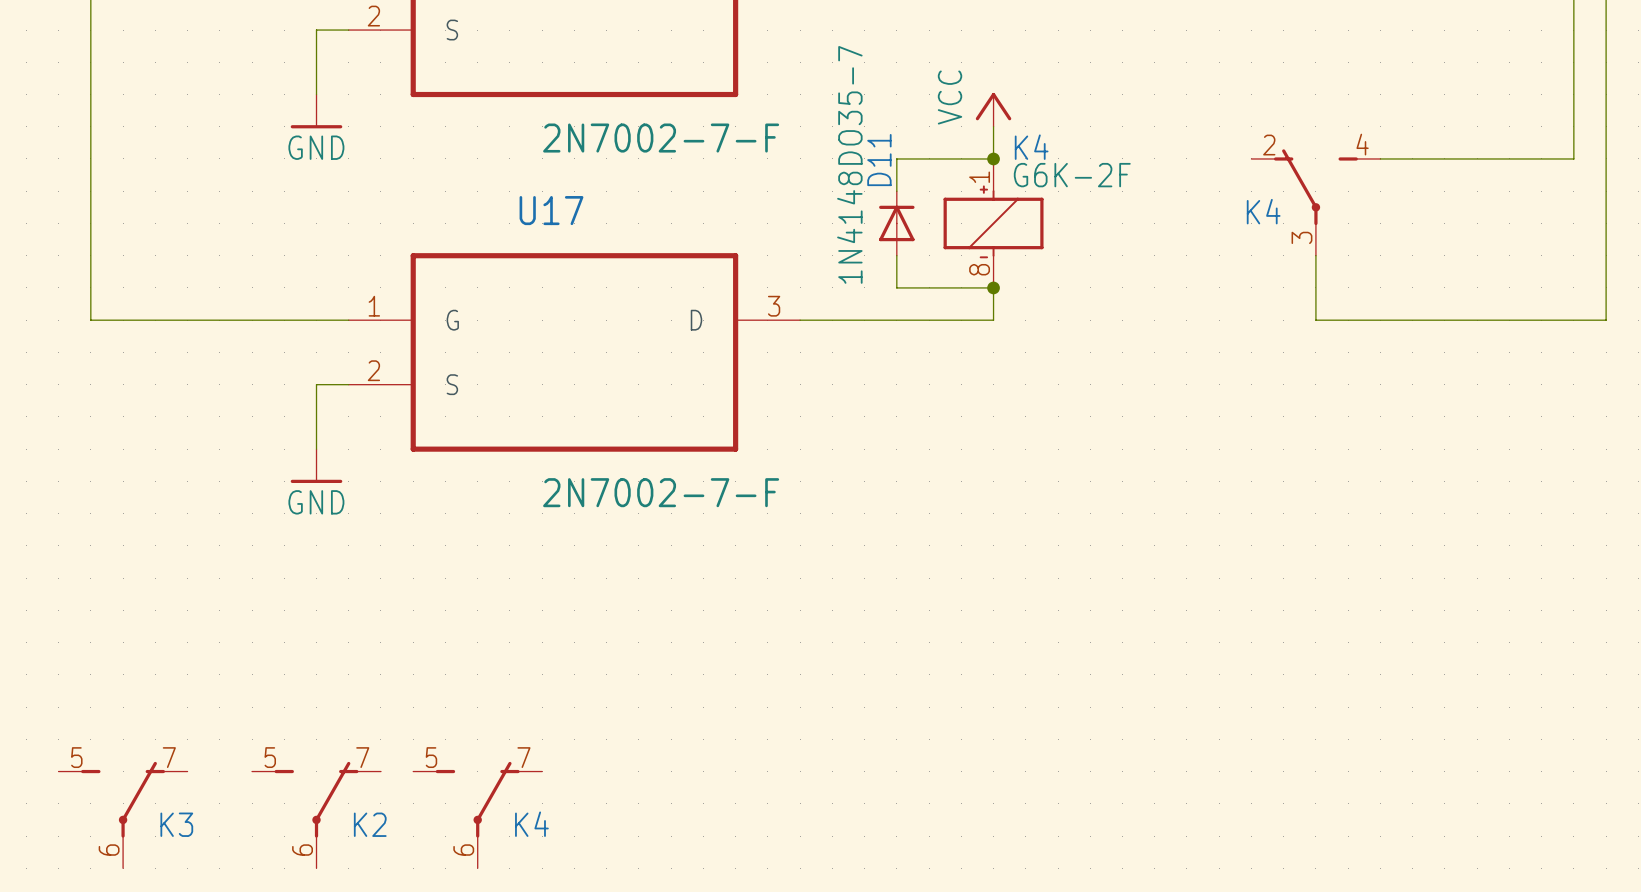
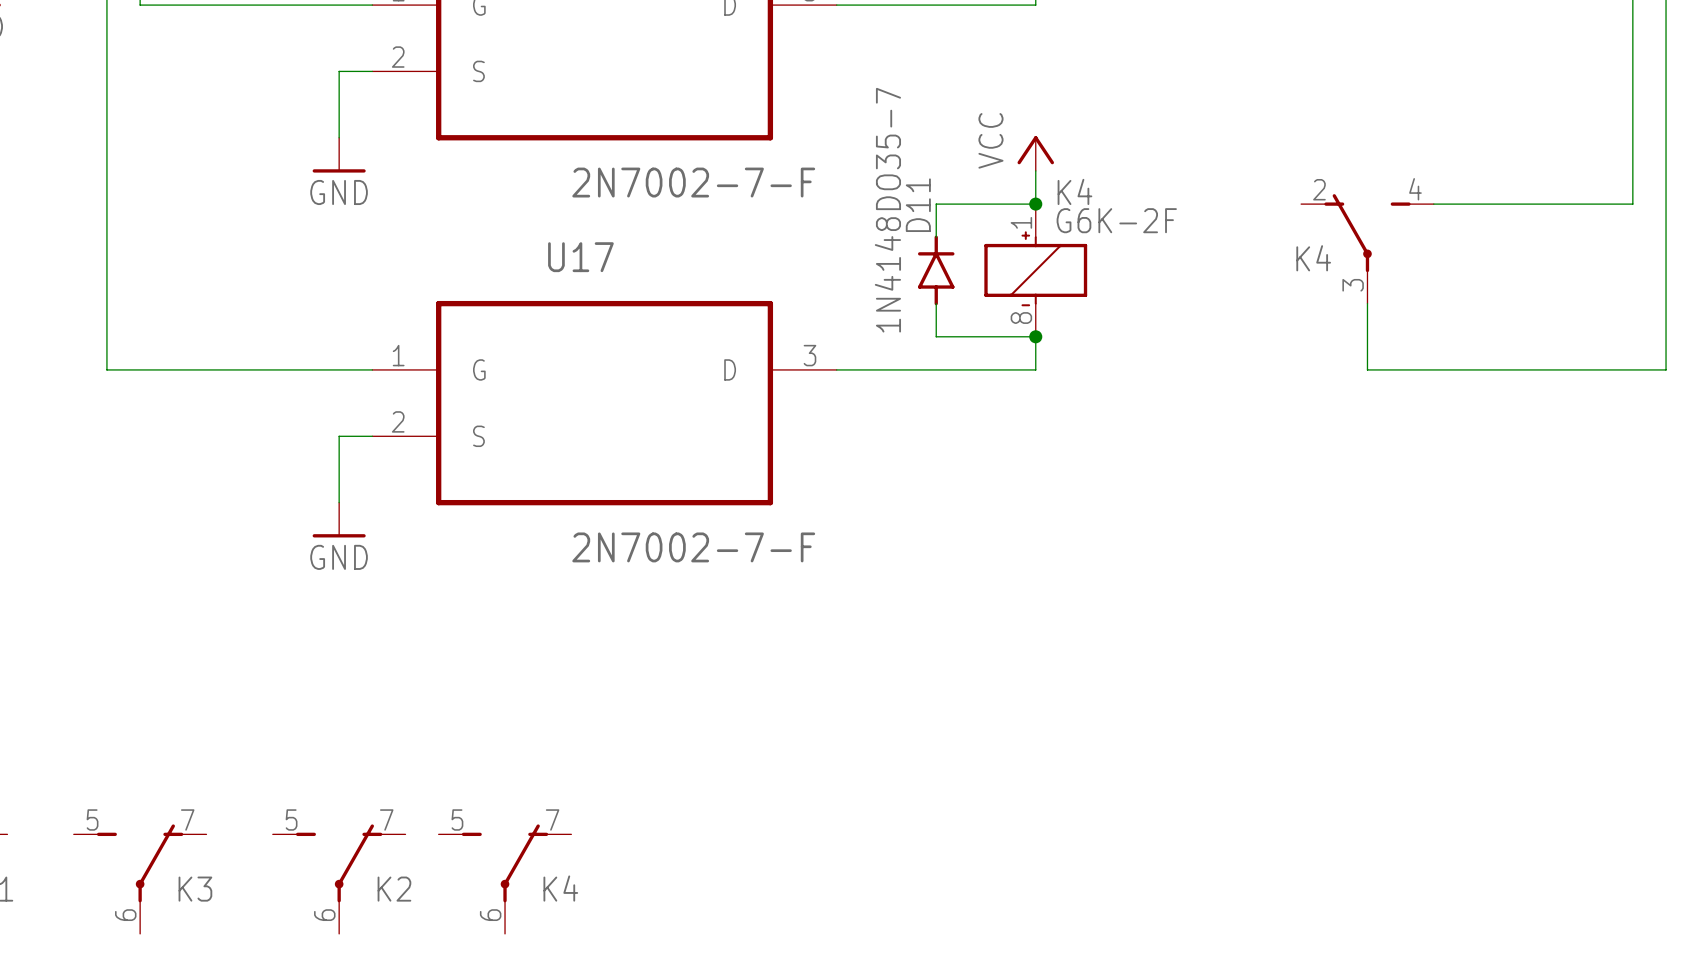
D11 symbol: [879, 191, 915, 256] -> [918, 235, 955, 306]

